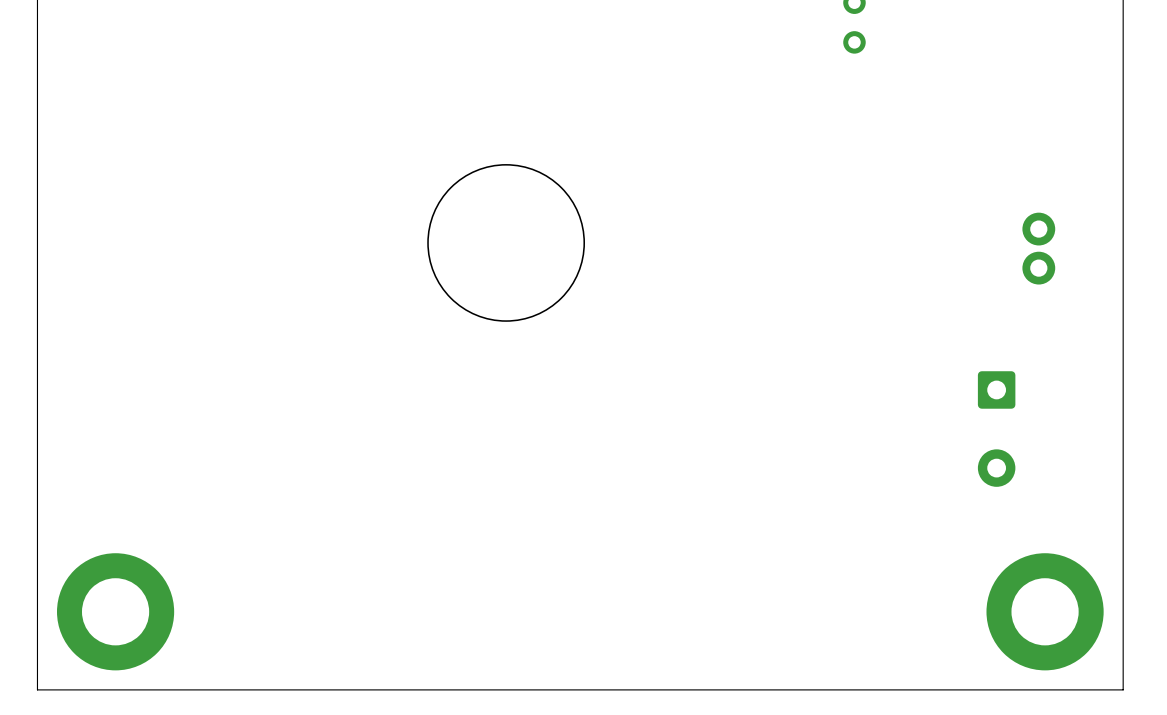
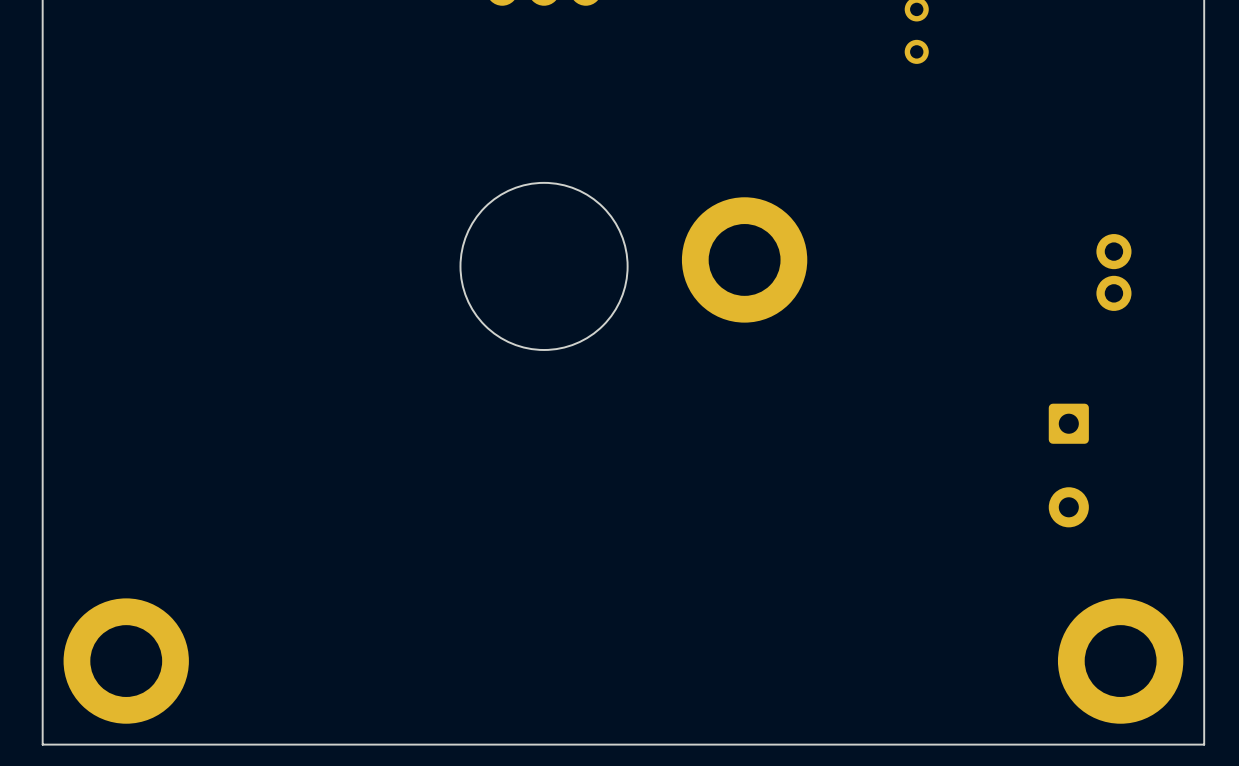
part: none -> (744, 259)

